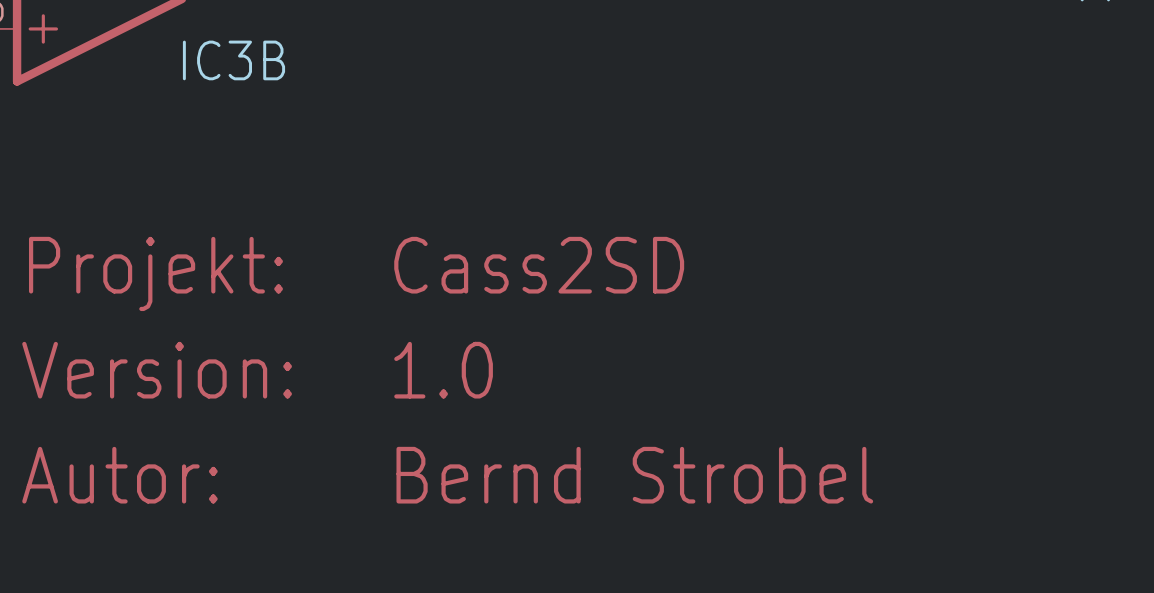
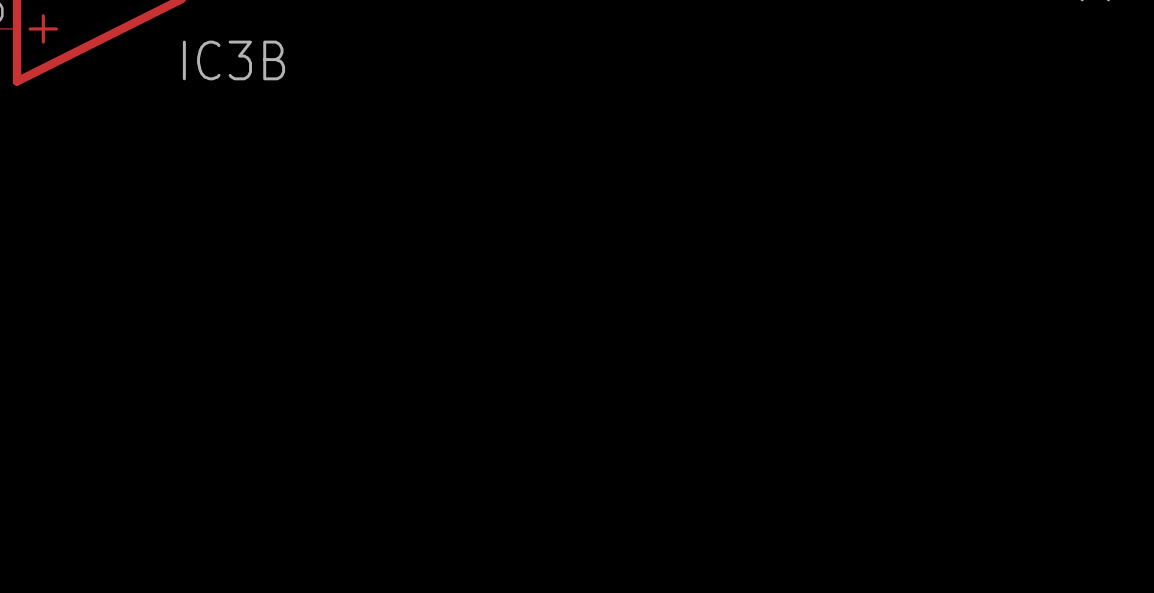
text: Cass2SD (539, 265) -> none
text: Projekt: (155, 273) -> none
text: Version: (157, 370) -> none
text: 1.0 (443, 370) -> none
text: Autor: (119, 475) -> none
text: Bernd Strobel (634, 475) -> none

